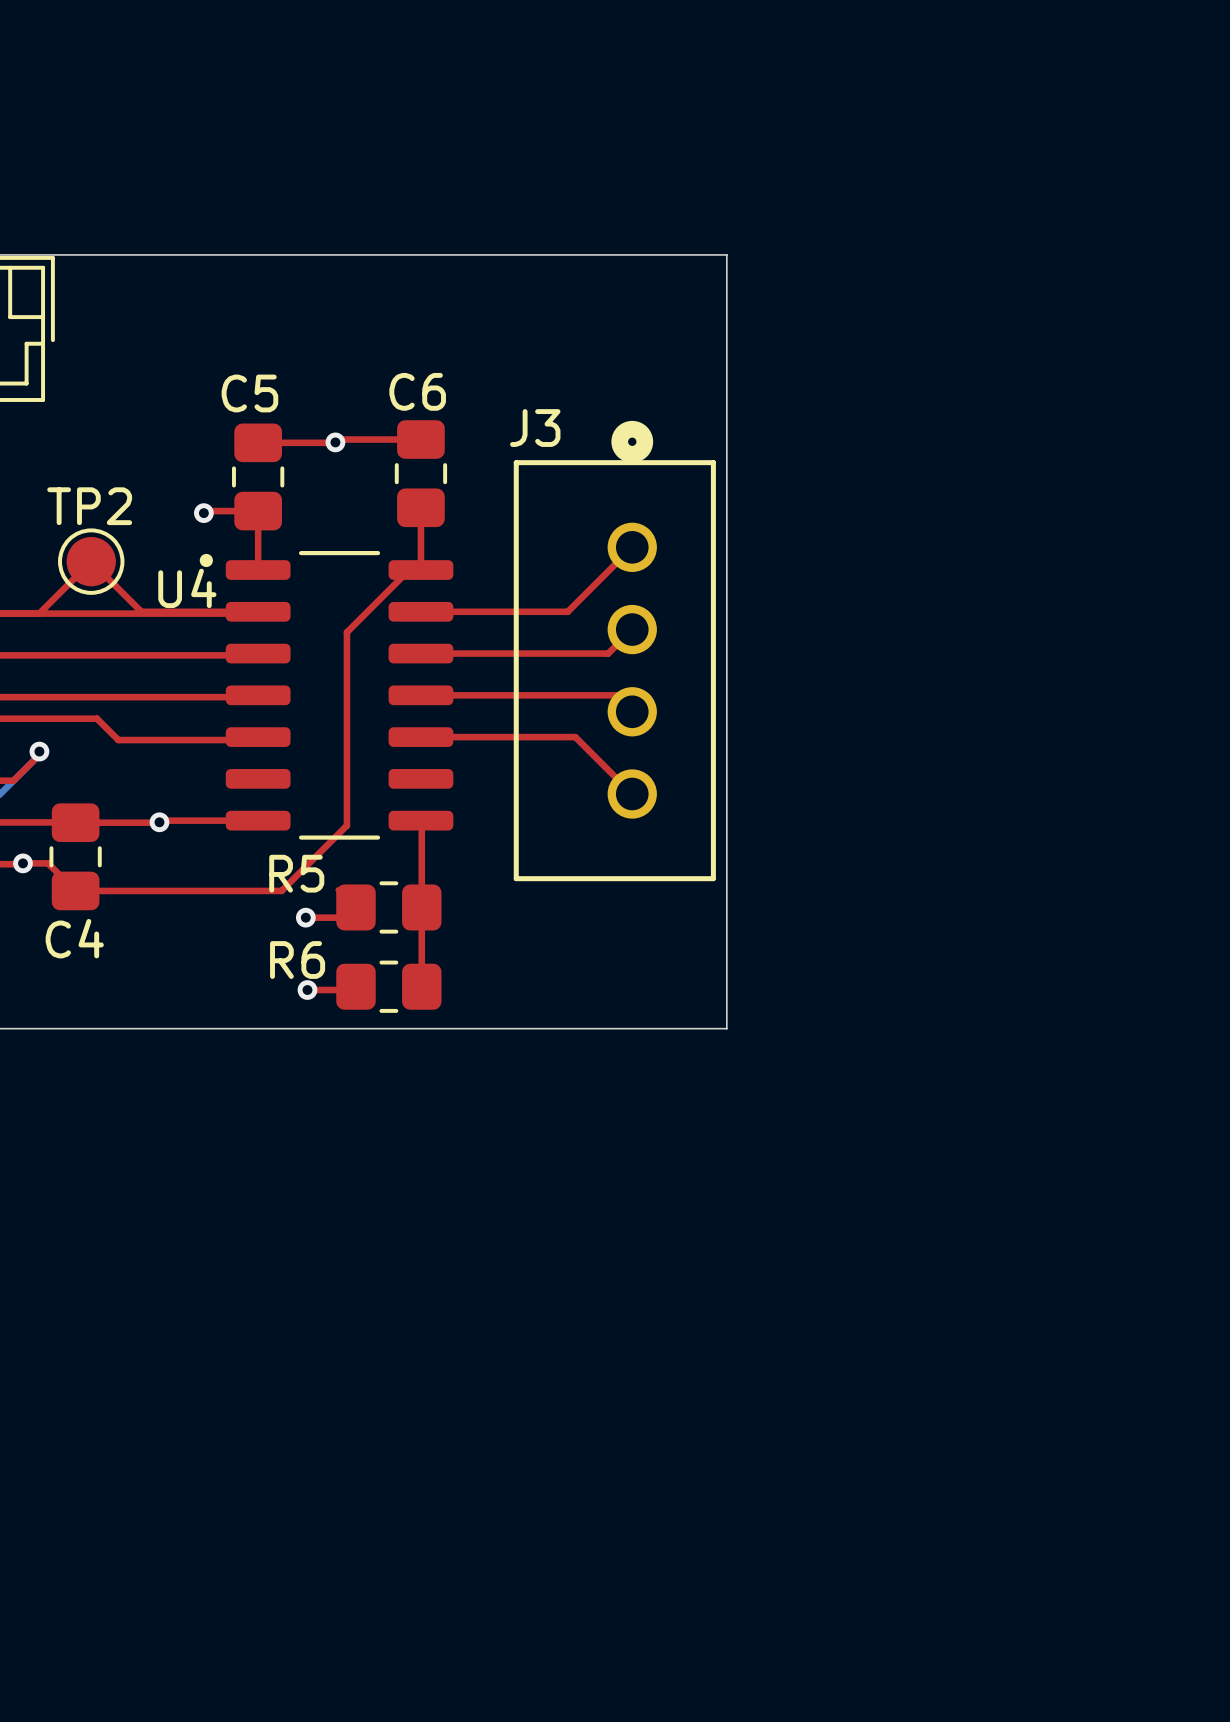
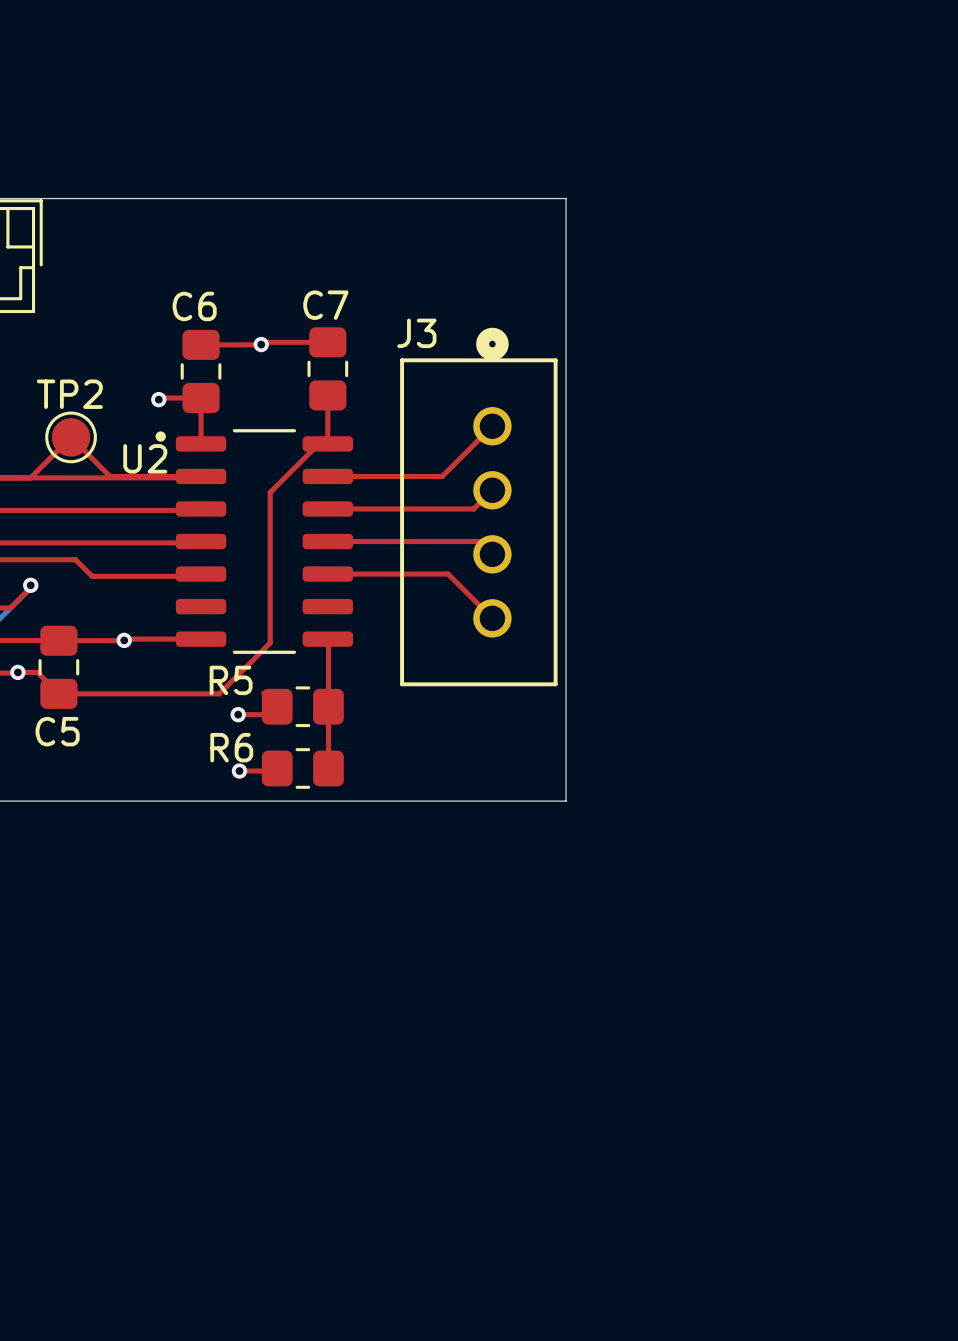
C6 name: C6 (417, 391) -> C7 (325, 305)
C5 name: C5 (249, 393) -> C6 (194, 306)
U4 name: U4 (187, 588) -> U2 (145, 458)
C4 name: C4 (74, 938) -> C5 (57, 731)

